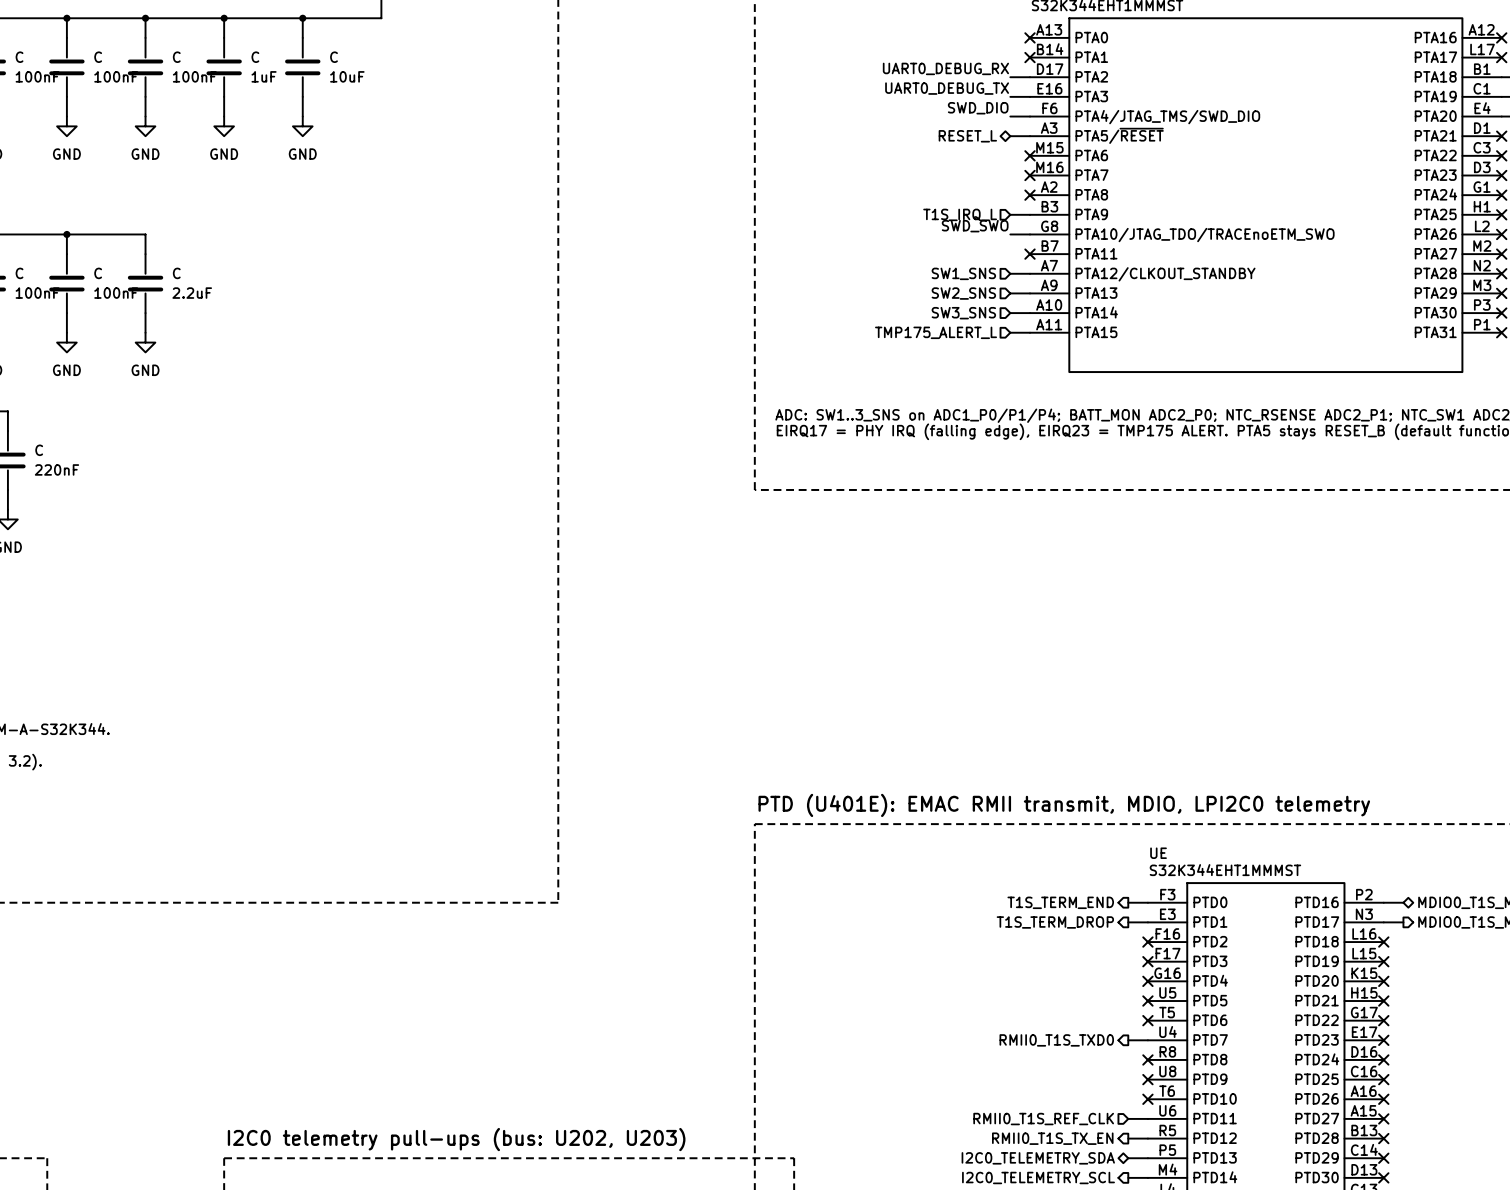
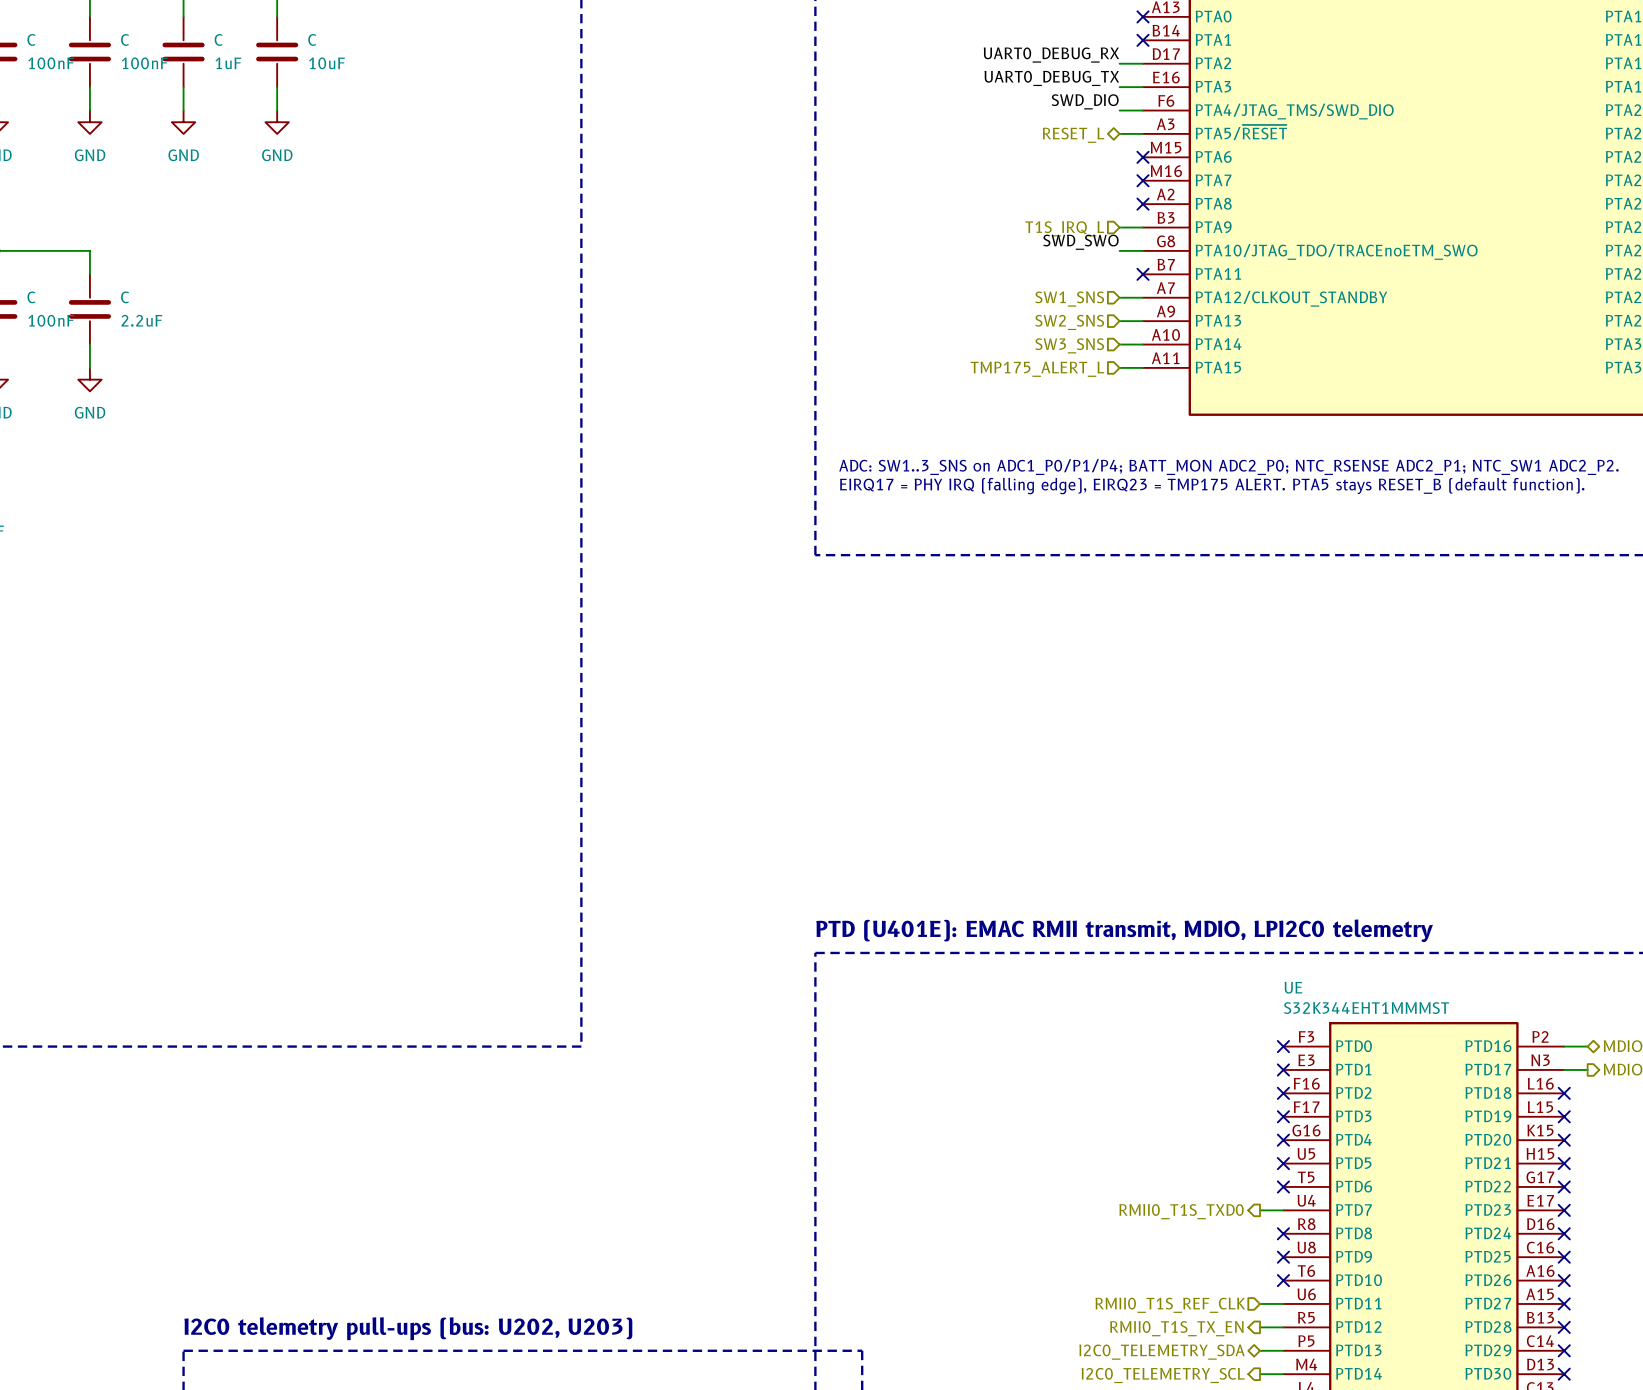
hierarchical label: T1S_TERM_END (1060, 902) -> none
wire: (1128, 902) (1147, 902) -> none
no-connect mark: none -> (1283, 1046)
hierarchical label: T1S_TERM_DROP (1055, 922) -> none
wire: (1128, 922) (1147, 922) -> none
no-connect mark: none -> (1283, 1069)

